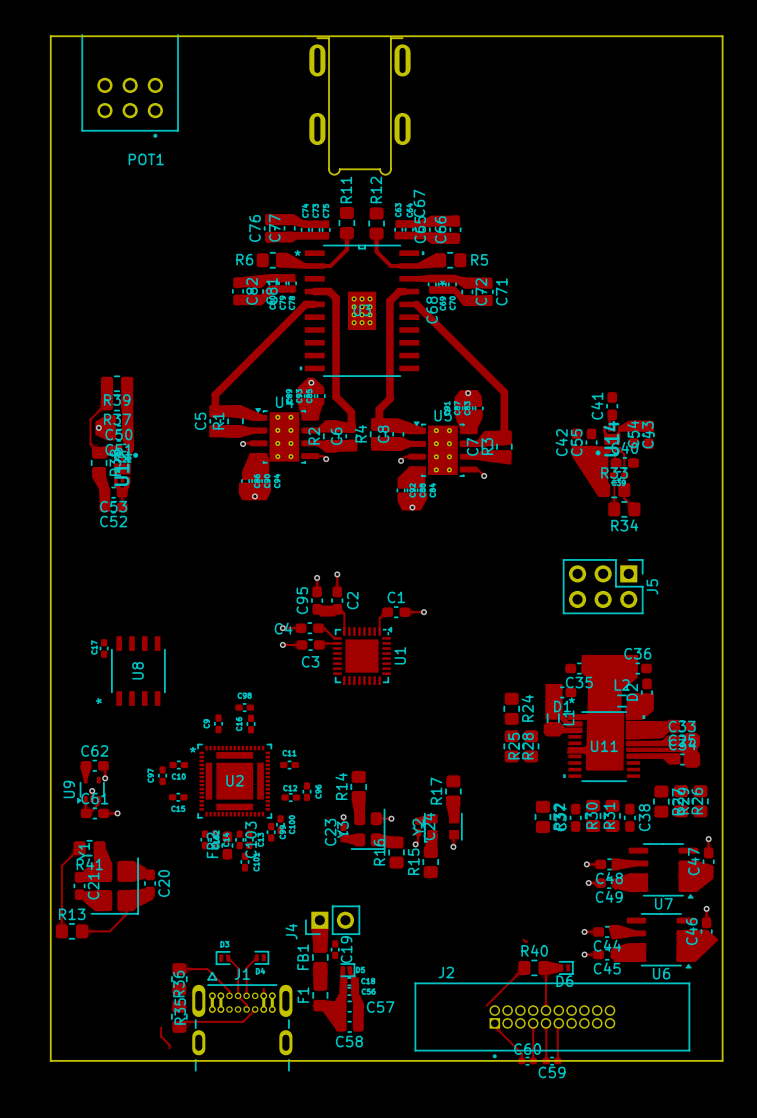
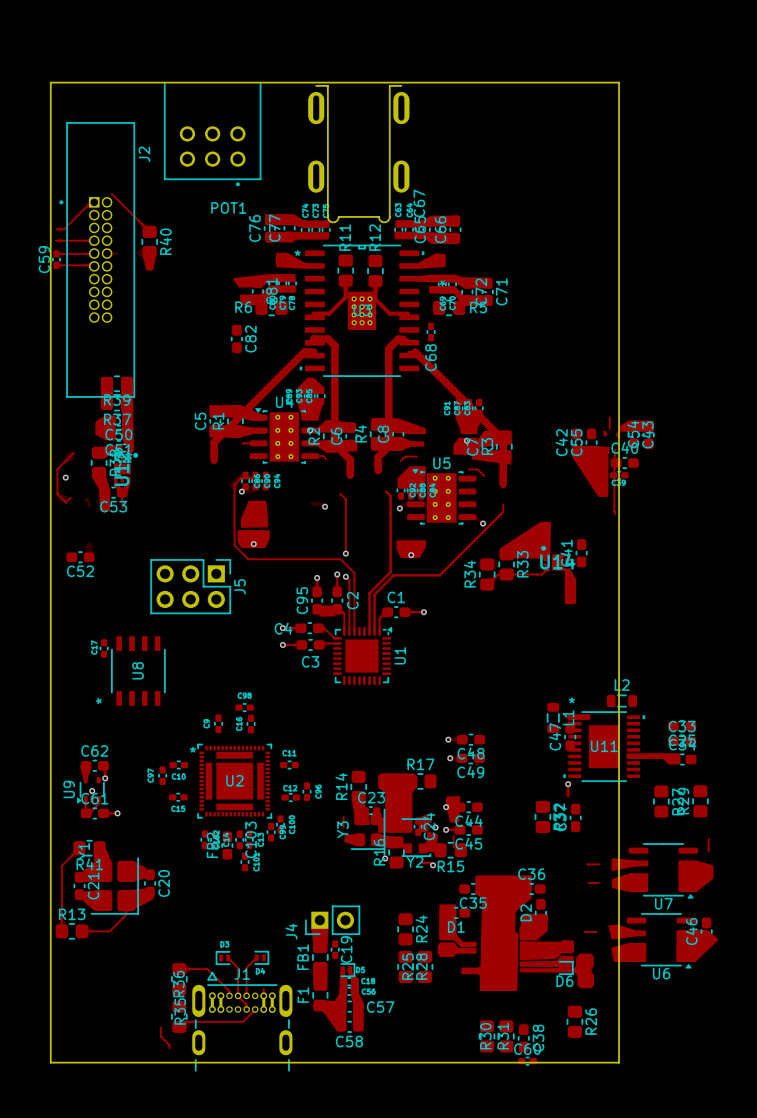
board edge: (50, 82) (50, 36) (722, 36) (722, 1060) (50, 1060) -> (50, 82) (619, 82) (619, 1062) (50, 1062) (50, 1060)
POT1 position: (130, 86) -> (212, 134)
part position: (359, 106) -> (358, 154)
track: none -> (111, 194) (149, 231)
track: none -> (91, 202) (64, 229) (56, 229)
R11 position: (346, 222) -> (345, 270)
R12 position: (376, 223) -> (375, 271)
track: (346, 233) (346, 249) (330, 265) (314, 265) -> (345, 280) (345, 297) (329, 313) (313, 313)
track: (376, 233) (376, 251) (390, 265) (409, 265) -> (375, 281) (375, 299) (389, 313) (408, 313)
track: none -> (56, 240) (94, 240)
track: none -> (94, 253) (56, 253)
drawing: none -> [143, 256, 156, 271]
R6 position: (272, 260) -> (271, 307)
R5 position: (450, 260) -> (449, 307)
track: none -> (56, 265) (94, 266)
C68 position: (432, 284) -> (431, 332)
C82 position: (238, 291) -> (236, 339)
track: (314, 291) (329, 291) (336, 298) (336, 396) (351, 412) (351, 427) -> (313, 339) (328, 339) (334, 345) (334, 444) (350, 459) (350, 475)
track: (409, 291) (399, 291) (389, 301) (389, 398) (379, 409) (378, 424) -> (408, 339) (398, 339) (388, 348) (388, 446) (378, 457) (376, 471)
track: (307, 304) (314, 304) (305, 304) (215, 394) (215, 412) -> (306, 352) (313, 352) (304, 352) (214, 442) (214, 460)
track: (409, 304) (416, 304) (504, 392) (504, 436) -> (408, 352) (415, 352) (503, 439) (503, 484)
via: (311, 382) -> none
via: (468, 393) -> none
drawing position: (468, 398) -> (467, 446)
track: (106, 403) (90, 419) (90, 444) (99, 452) (103, 448) -> (73, 452) (57, 469) (57, 493) (65, 502) (70, 497)
C41 position: (612, 406) -> (581, 553)
via position: (98, 427) -> (65, 477)
via: none -> (310, 430)
via: none -> (467, 440)
U14 rotation: 0° (608, 440) -> 90° clockwise (556, 558)
U14 position: (608, 440) -> (556, 558)
via: (243, 443) -> none
U5 position: (442, 449) -> (441, 496)
track: (619, 449) (624, 454) (624, 498) (634, 508) -> none
drawing: [242, 453, 270, 481] -> none
via: (326, 459) -> none
via: (401, 460) -> none
via: (484, 475) -> none
track: none -> (257, 478) (240, 478) (234, 484) (234, 545) (248, 559) (340, 559) (354, 573) (354, 579)
R33 rotation: 0° (614, 489) -> 90° clockwise (506, 564)
R33 position: (614, 489) -> (506, 564)
drawing position: (254, 491) -> (253, 539)
track: none -> (386, 491) (390, 496) (390, 572) (369, 593) (369, 631)
track: none -> (340, 493) (345, 499) (345, 553)
via position: (254, 496) -> (241, 491)
drawing: none -> [240, 500, 269, 528]
drawing position: (412, 501) -> (411, 549)
track: none -> (503, 504) (503, 512) (439, 575) (393, 575) (374, 594) (374, 631)
via: none -> (325, 506)
C52 position: (113, 507) -> (80, 557)
via position: (412, 507) -> (399, 508)
R34 rotation: 0° (624, 509) -> 90° clockwise (487, 574)
R34 position: (624, 509) -> (487, 574)
drawing: none -> [499, 521, 577, 605]
via: none -> (483, 523)
via: none -> (253, 544)
via: none -> (345, 553)
via: none -> (411, 555)
track: none -> (546, 569) (542, 574) (498, 574) (487, 584)
track: none -> (345, 576) (349, 580) (349, 631)
via: none -> (345, 576)
track: none -> (354, 579) (354, 631)
J5 position: (603, 586) -> (190, 586)
C35 position: (579, 668) -> (473, 889)
C36 position: (637, 668) -> (531, 889)
D1 position: (562, 692) -> (456, 912)
D2 position: (647, 692) -> (540, 913)
drawing position: (563, 705) -> (457, 925)
drawing position: (639, 706) -> (533, 927)
R24 position: (511, 708) -> (405, 929)
drawing position: (602, 712) -> (496, 933)
drawing position: (563, 729) -> (457, 949)
drawing position: (652, 729) -> (546, 950)
via: none -> (448, 739)
drawing position: (652, 741) -> (546, 961)
R28 position: (511, 746) -> (405, 966)
R25 position: (531, 746) -> (425, 966)
drawing position: (663, 750) -> (557, 970)
via: none -> (450, 758)
drawing: none -> [357, 773, 418, 833]
via: none -> (568, 784)
R17 rotation: 0° (453, 791) -> 90° clockwise (420, 781)
R17 position: (453, 791) -> (420, 781)
R26 position: (681, 801) -> (574, 1021)
via: none -> (446, 807)
R31 position: (593, 815) -> (486, 1036)
R30 position: (612, 815) -> (506, 1036)
via: (343, 817) -> none
C38 position: (629, 817) -> (523, 1038)
via: (391, 818) -> none
via: none -> (435, 827)
Y2 rotation: 0° (443, 827) -> 90° counterclockwise (416, 837)
Y2 position: (443, 827) -> (416, 837)
via: none -> (446, 829)
C23 rotation: 0° (343, 832) -> 90° clockwise (370, 810)
C23 position: (343, 832) -> (370, 810)
track: (418, 832) (418, 841) (415, 844) -> none
via: (708, 839) -> none
via: (415, 844) -> none
via: (453, 846) -> none
via: none -> (385, 858)
R15 name position: R15 (413, 861) -> R15 (450, 866)
C47 position: (708, 861) -> (570, 737)
track: none -> (421, 862) (430, 862) (433, 865)
R15 rotation: 0° (430, 862) -> 90° clockwise (450, 850)
R15 position: (430, 862) -> (450, 850)
via: (586, 864) -> none
C48 position: (609, 864) -> (471, 739)
via: none -> (433, 865)
via: (588, 883) -> none
C49 position: (609, 883) -> (470, 758)
track: (615, 889) (615, 889) -> (477, 764) (477, 764)
track: (706, 908) (706, 921) -> (568, 784) (568, 796)
via: (706, 908) -> none
via: (584, 931) -> none
C44 position: (607, 931) -> (468, 807)
track: (523, 939) (527, 941) -> none
track: (584, 954) (596, 954) -> (446, 829) (458, 829)
via: (584, 954) -> none
C45 position: (607, 954) -> (468, 829)
drawing: [549, 961, 564, 975] -> none
track: (524, 967) (486, 1005) -> none
R40 rotation: 0° (534, 967) -> 90° clockwise (149, 241)
R40 position: (534, 967) -> (149, 241)
track: (544, 967) (545, 1010) -> none
J2 rotation: 0° (552, 1020) -> 90° clockwise (97, 259)
J2 position: (552, 1020) -> (97, 259)
track: (533, 1023) (533, 1061) -> none
track: (545, 1023) (546, 1061) -> none
track: (558, 1023) (557, 1061) -> none
track: (494, 1026) (521, 1053) (521, 1061) -> none
C59 rotation: 0° (552, 1061) -> 90° clockwise (56, 259)
C59 position: (552, 1061) -> (56, 259)

